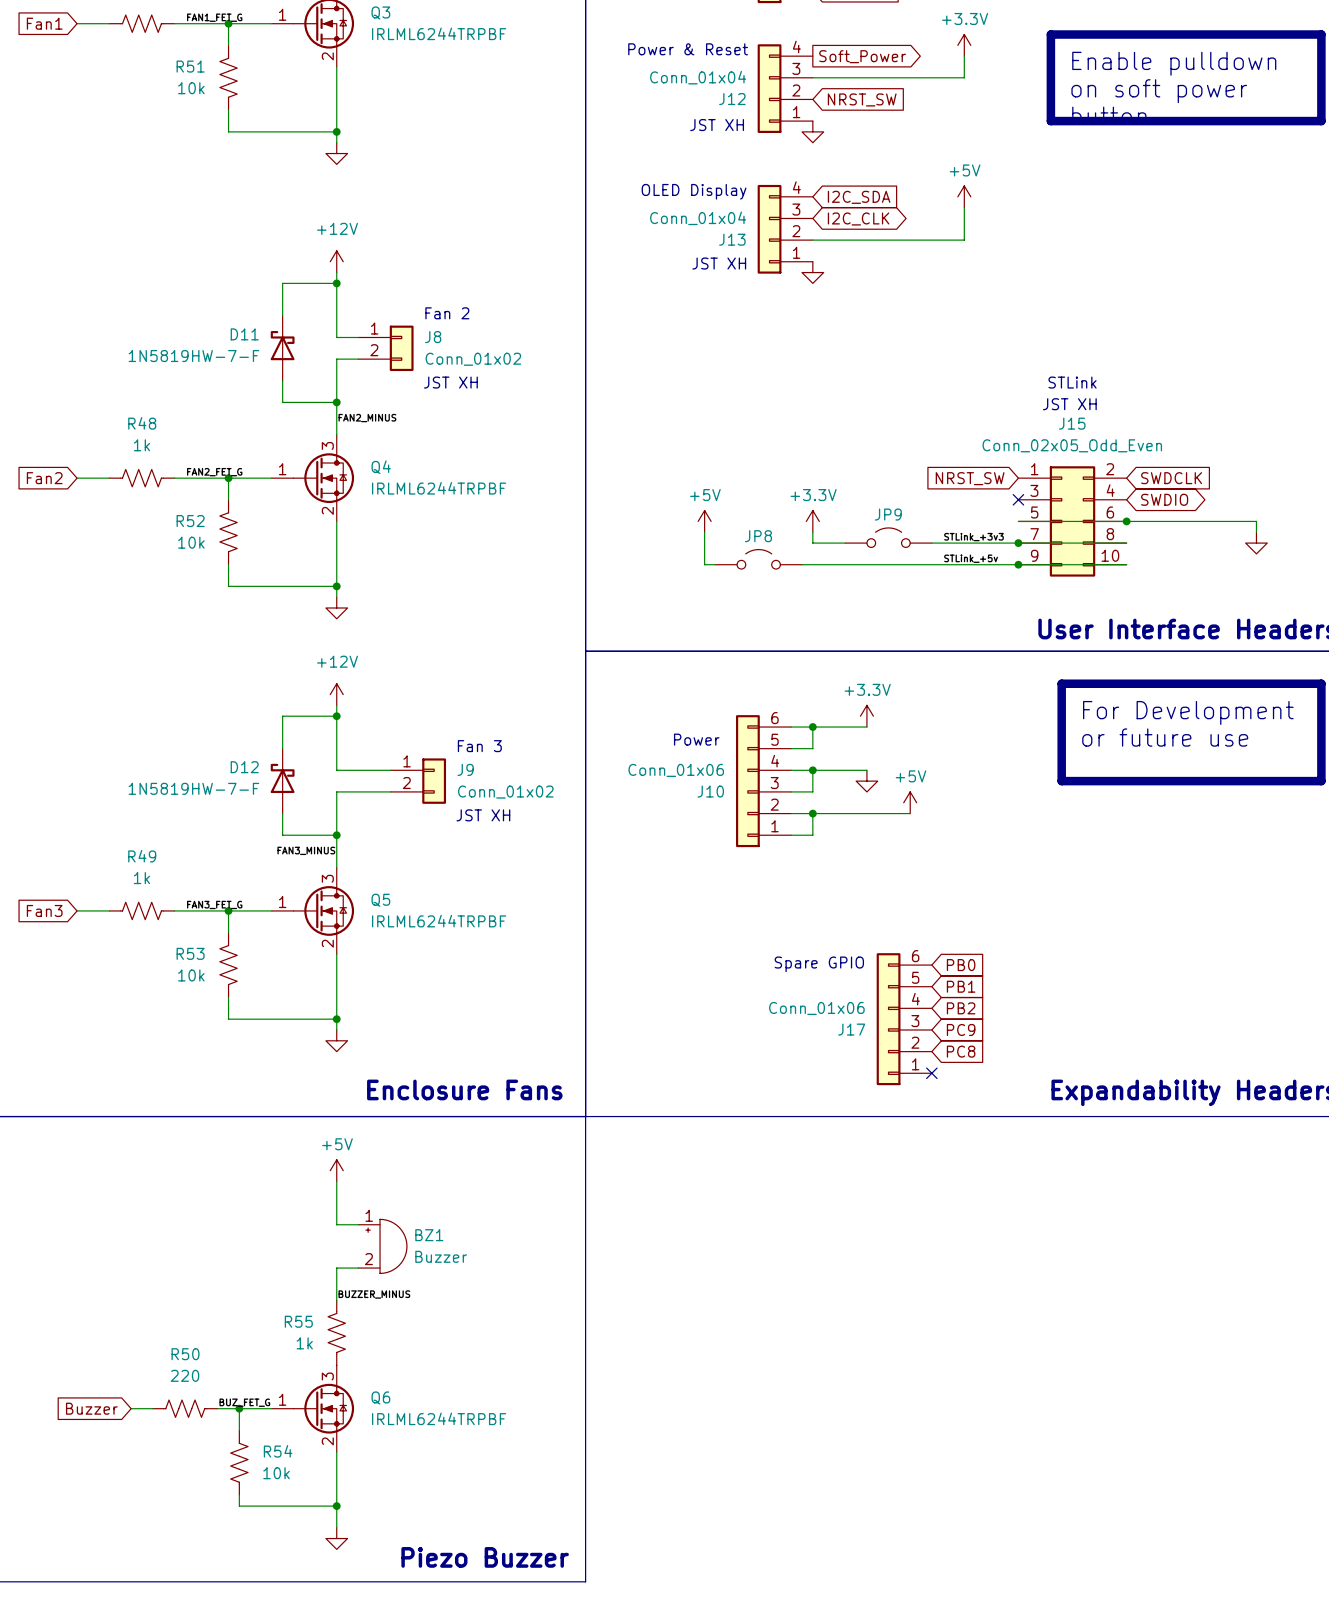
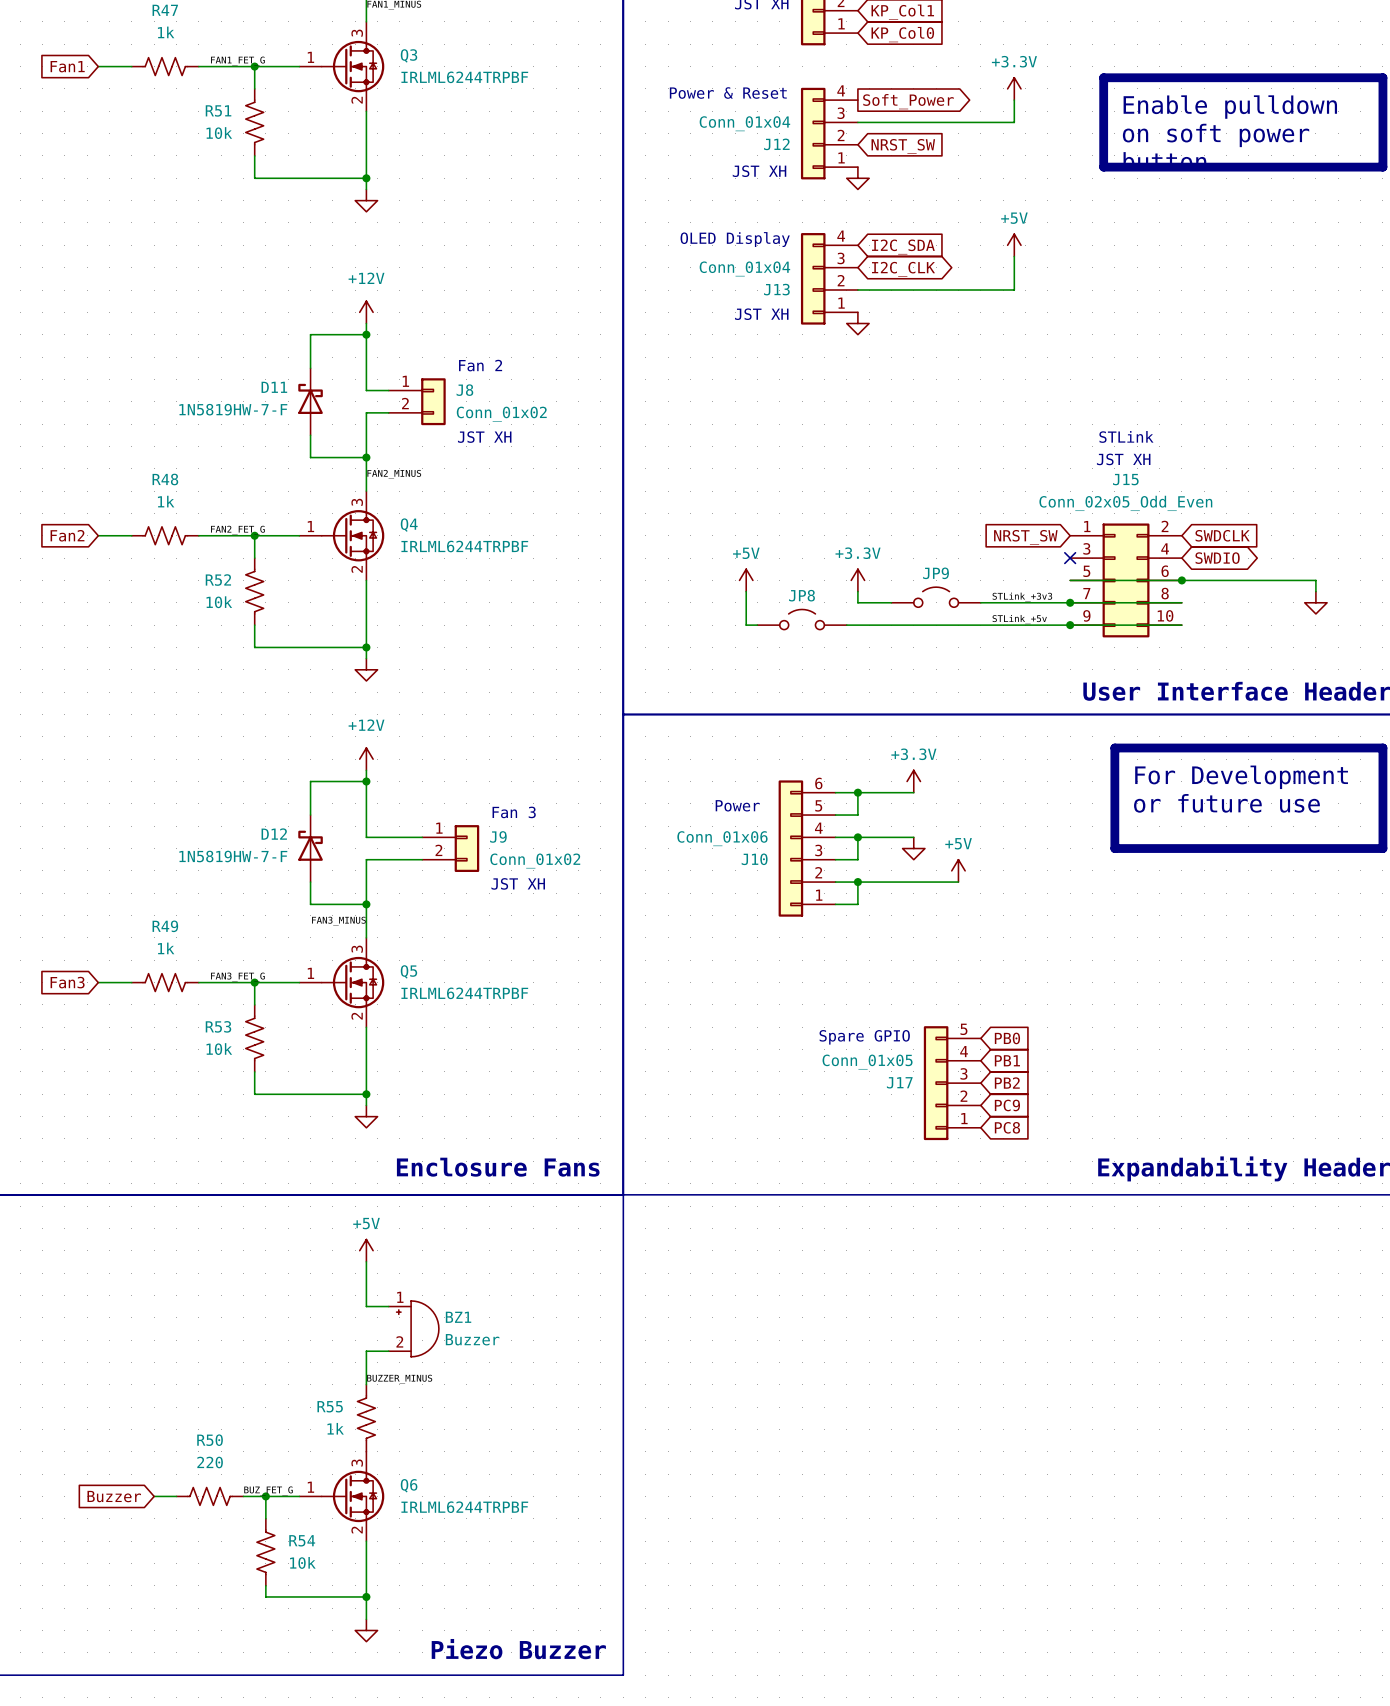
J17 symbol: [876, 953, 932, 1086] -> [923, 1026, 981, 1141]
J17 value: Conn_01x06 (816, 1008) -> Conn_01x05 (867, 1062)
no-connect mark: (931, 1073) -> none

